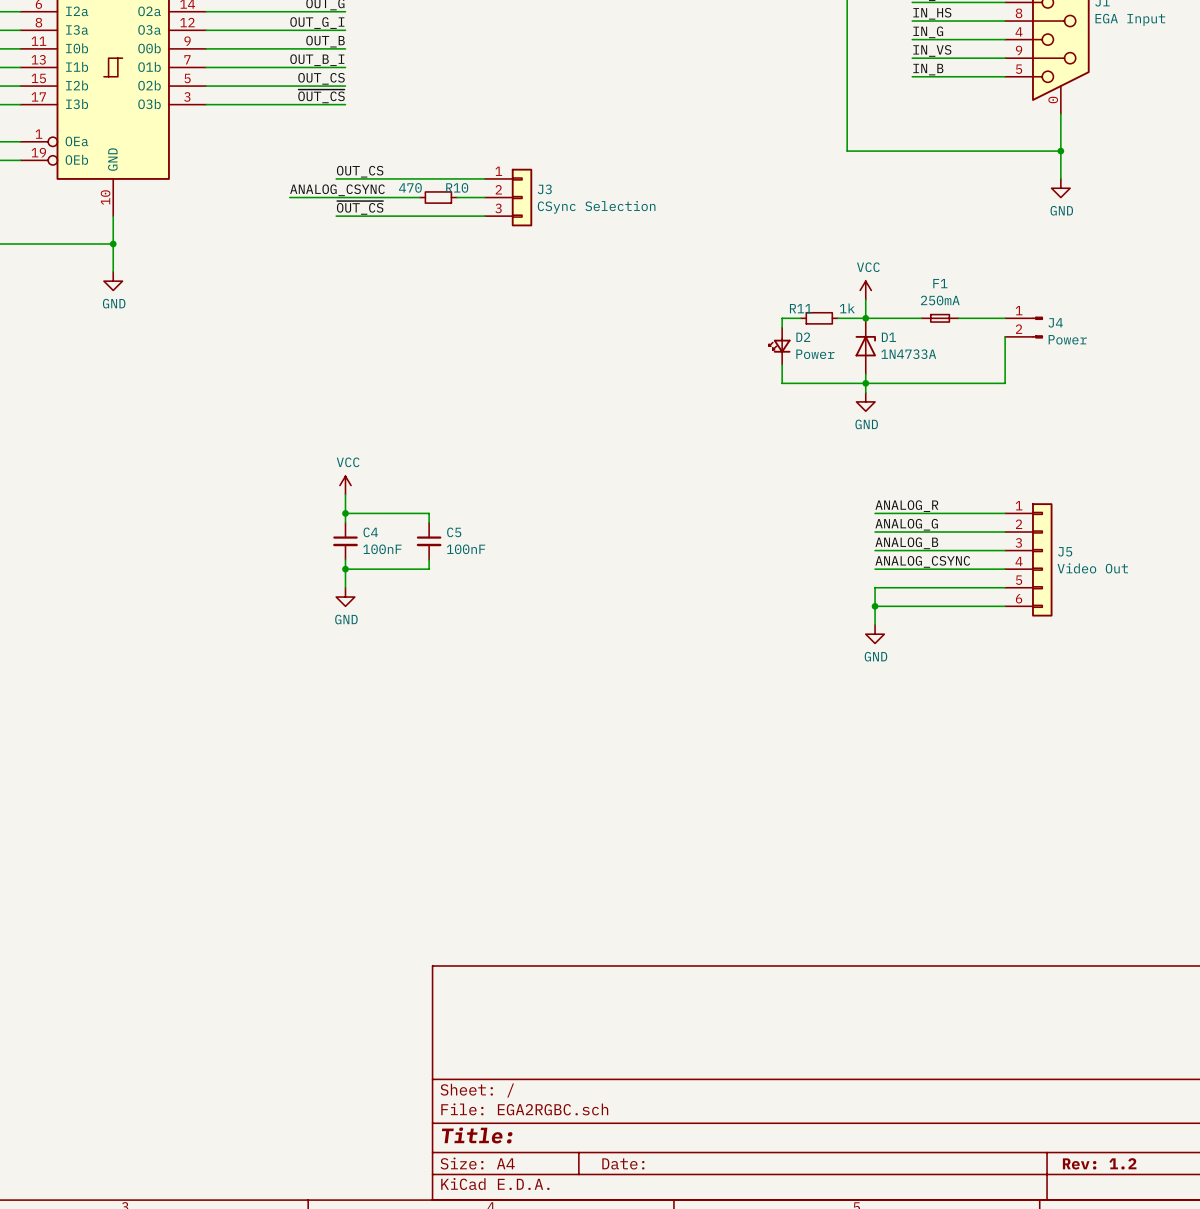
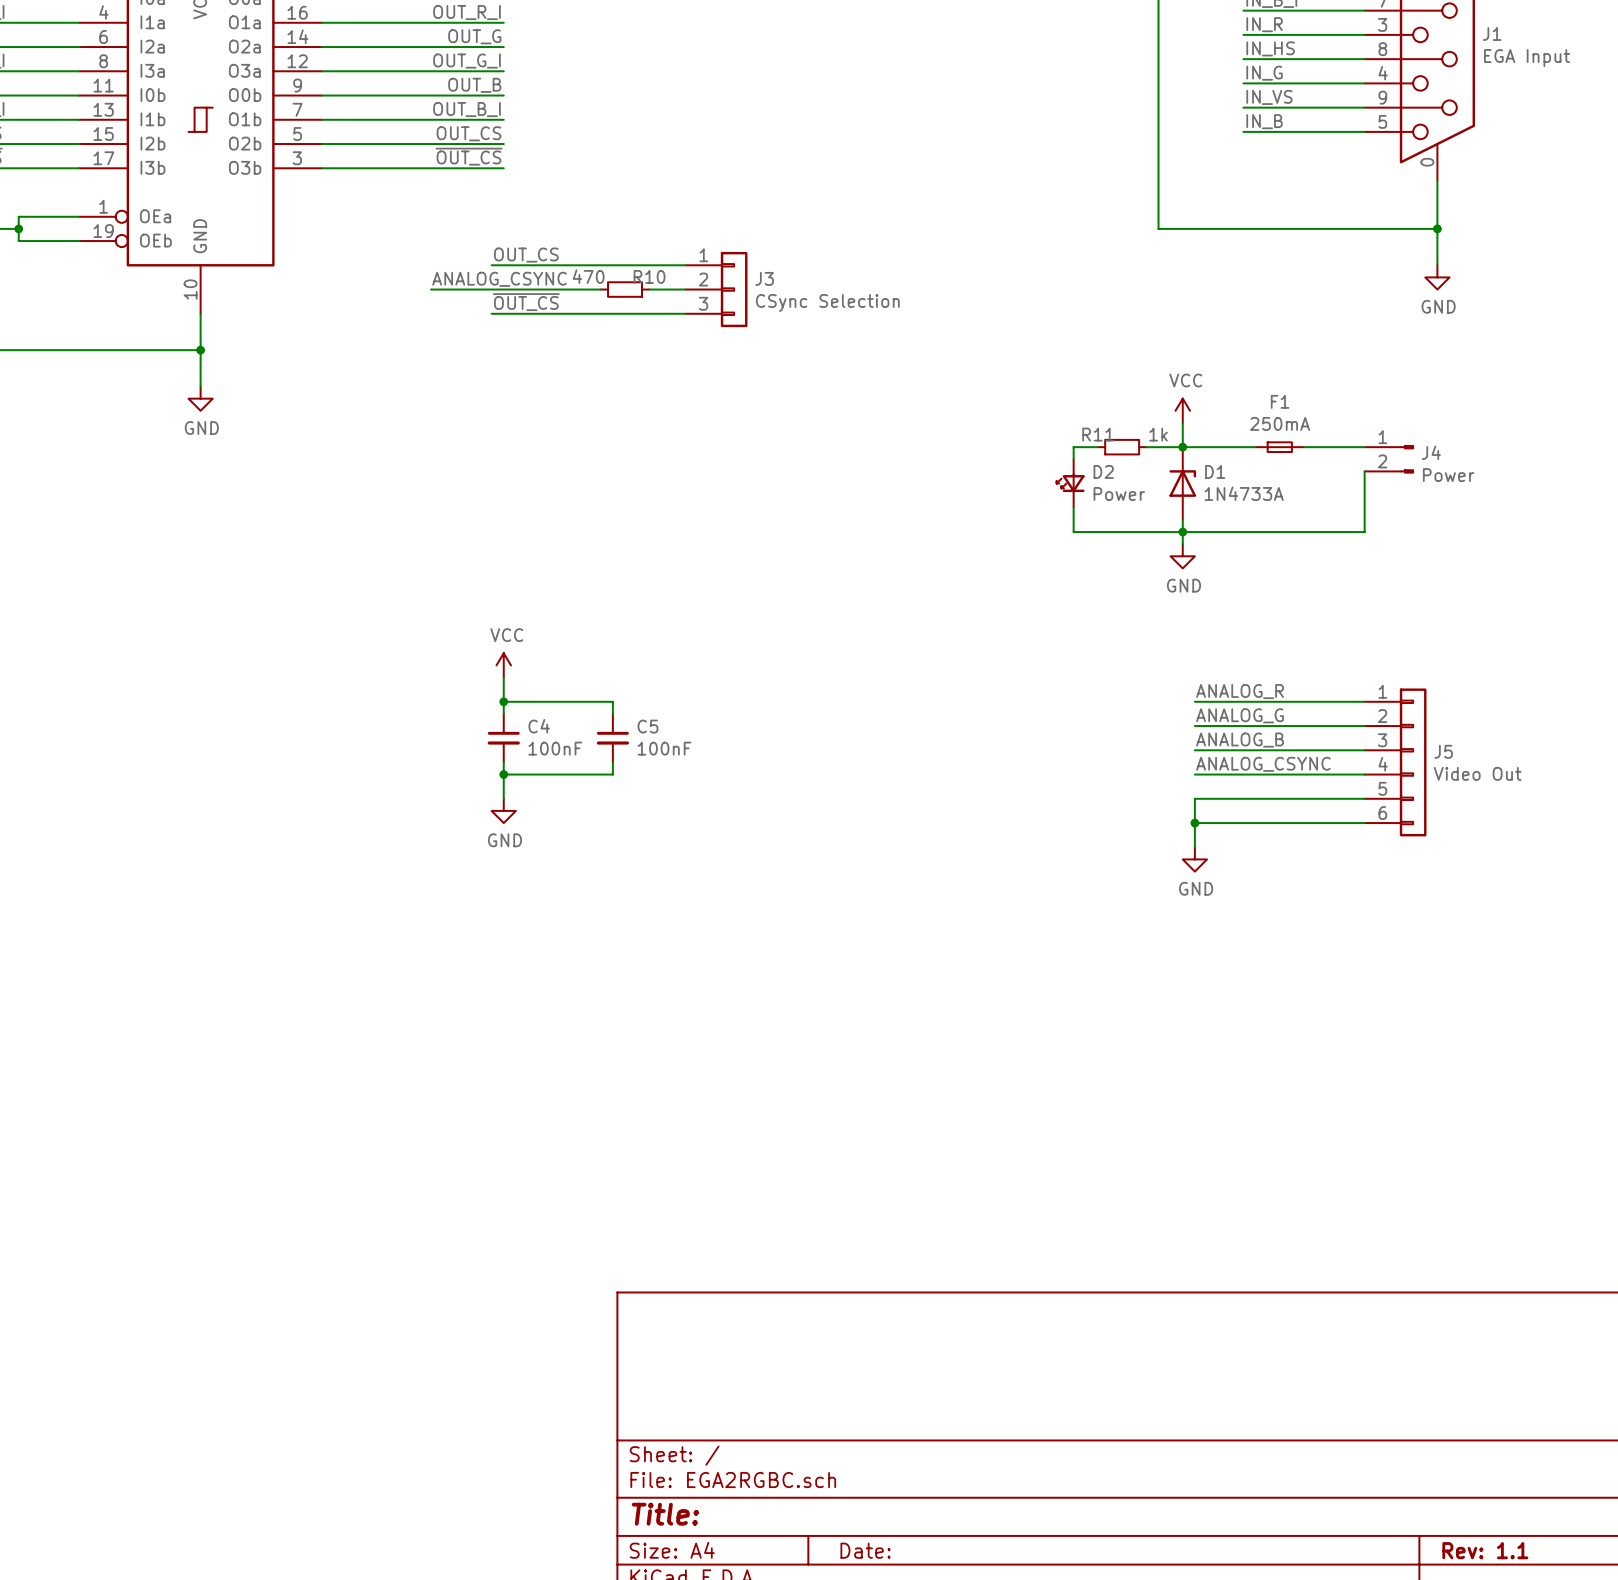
title block: Rev: 1.2 (1099, 1163) -> Rev: 1.1 (1485, 1550)

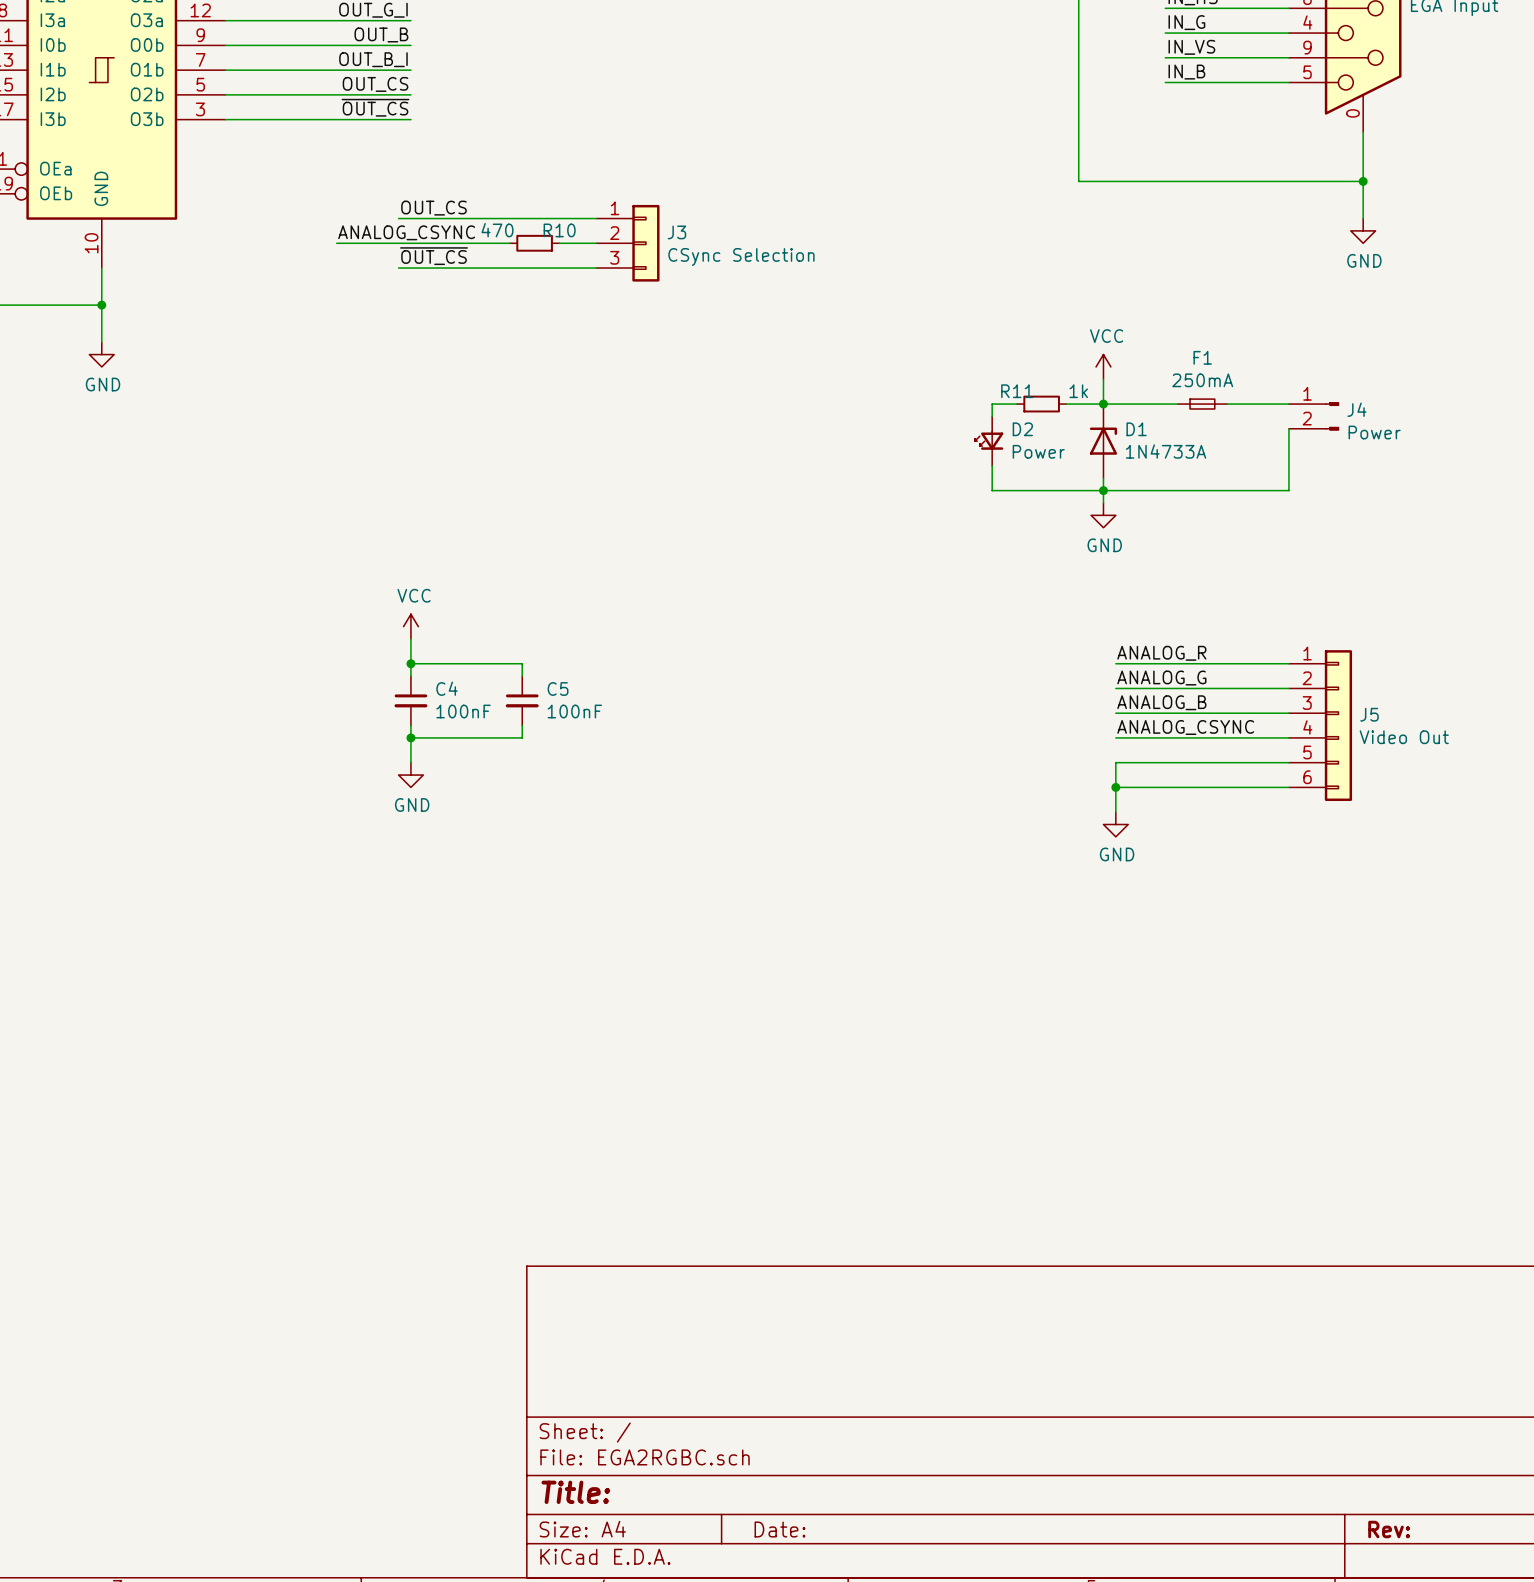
title block: Rev: 1.1 (1485, 1550) -> Rev: (1389, 1529)

